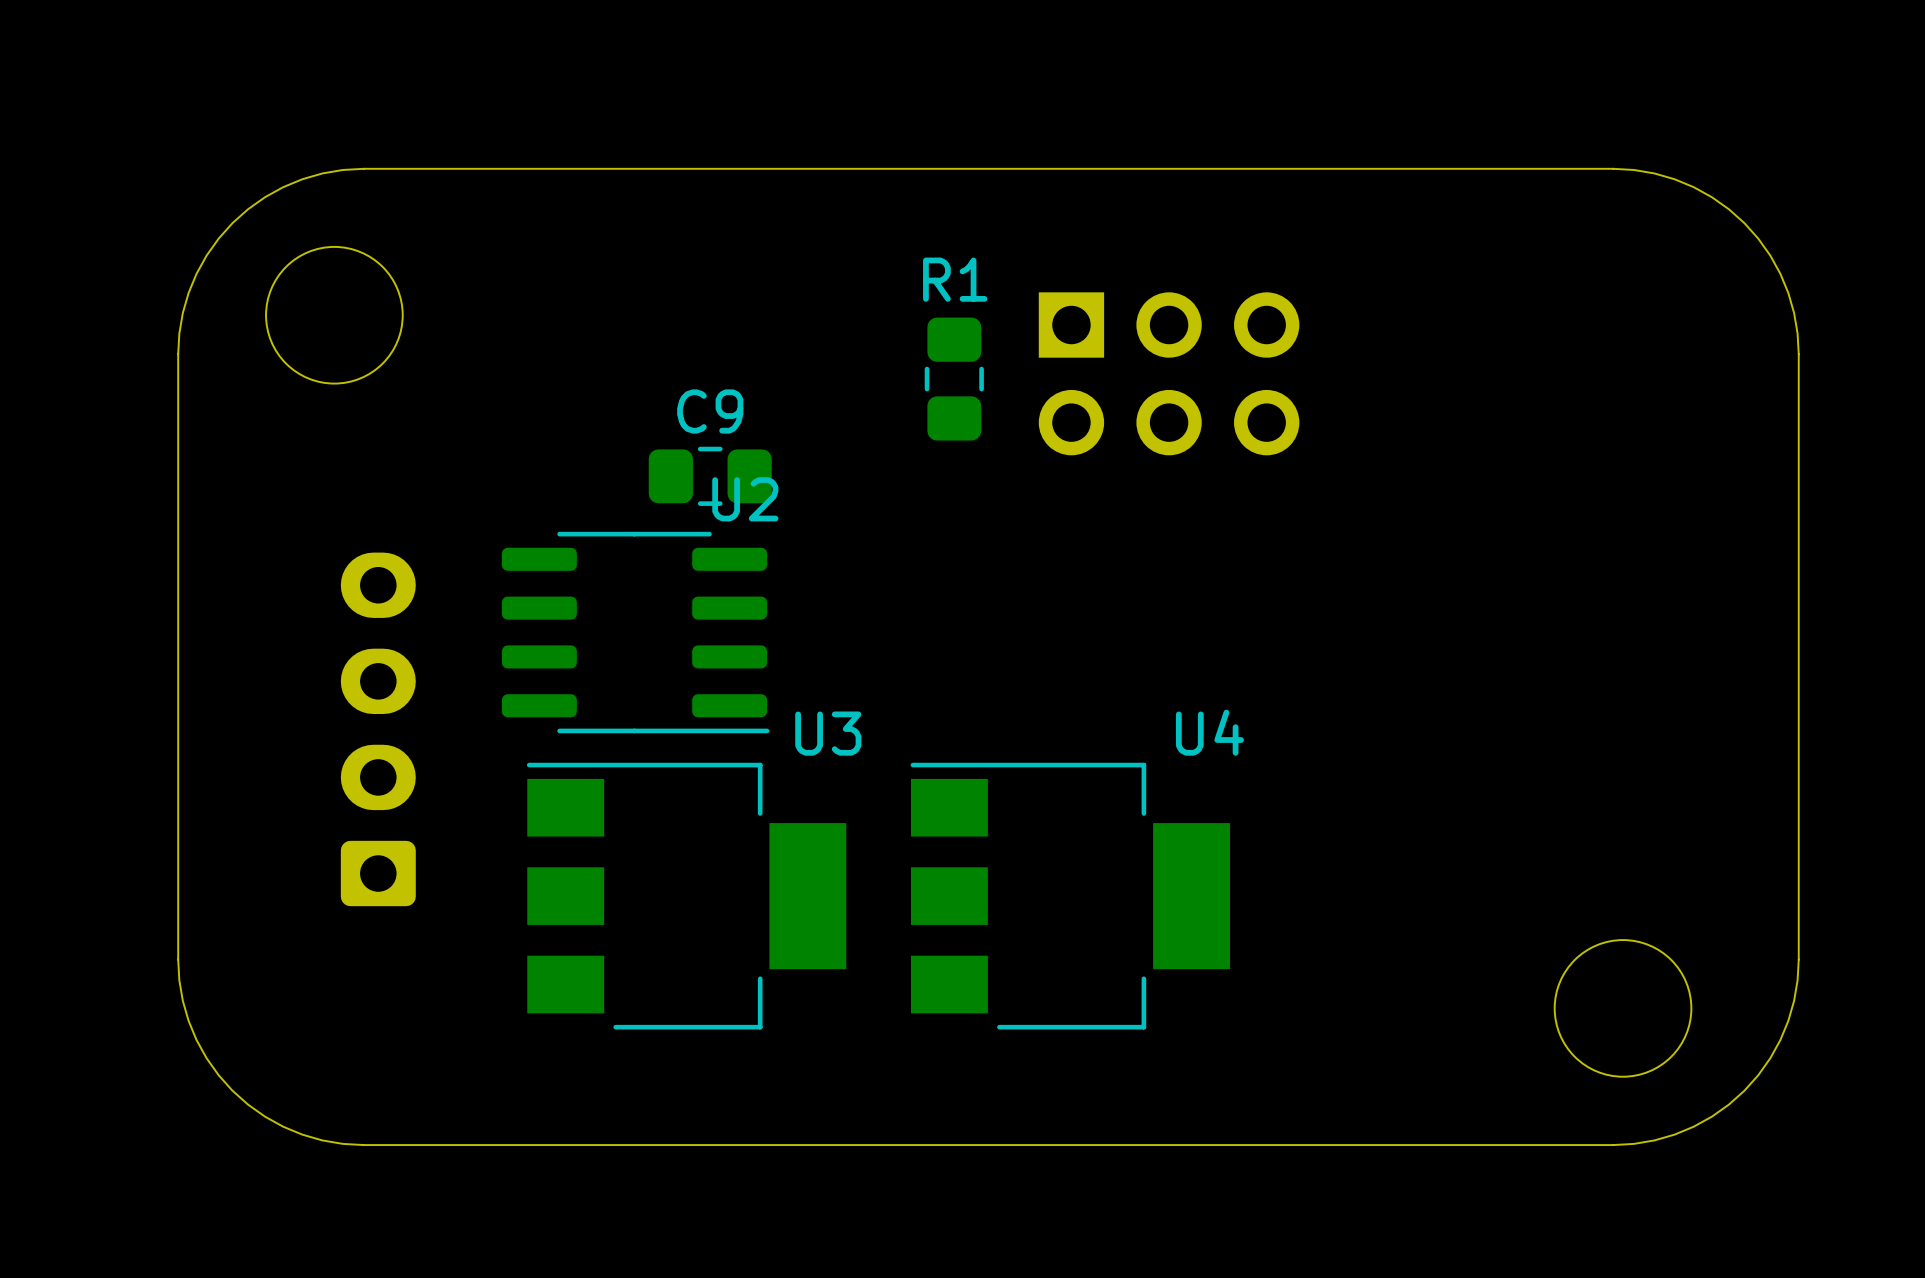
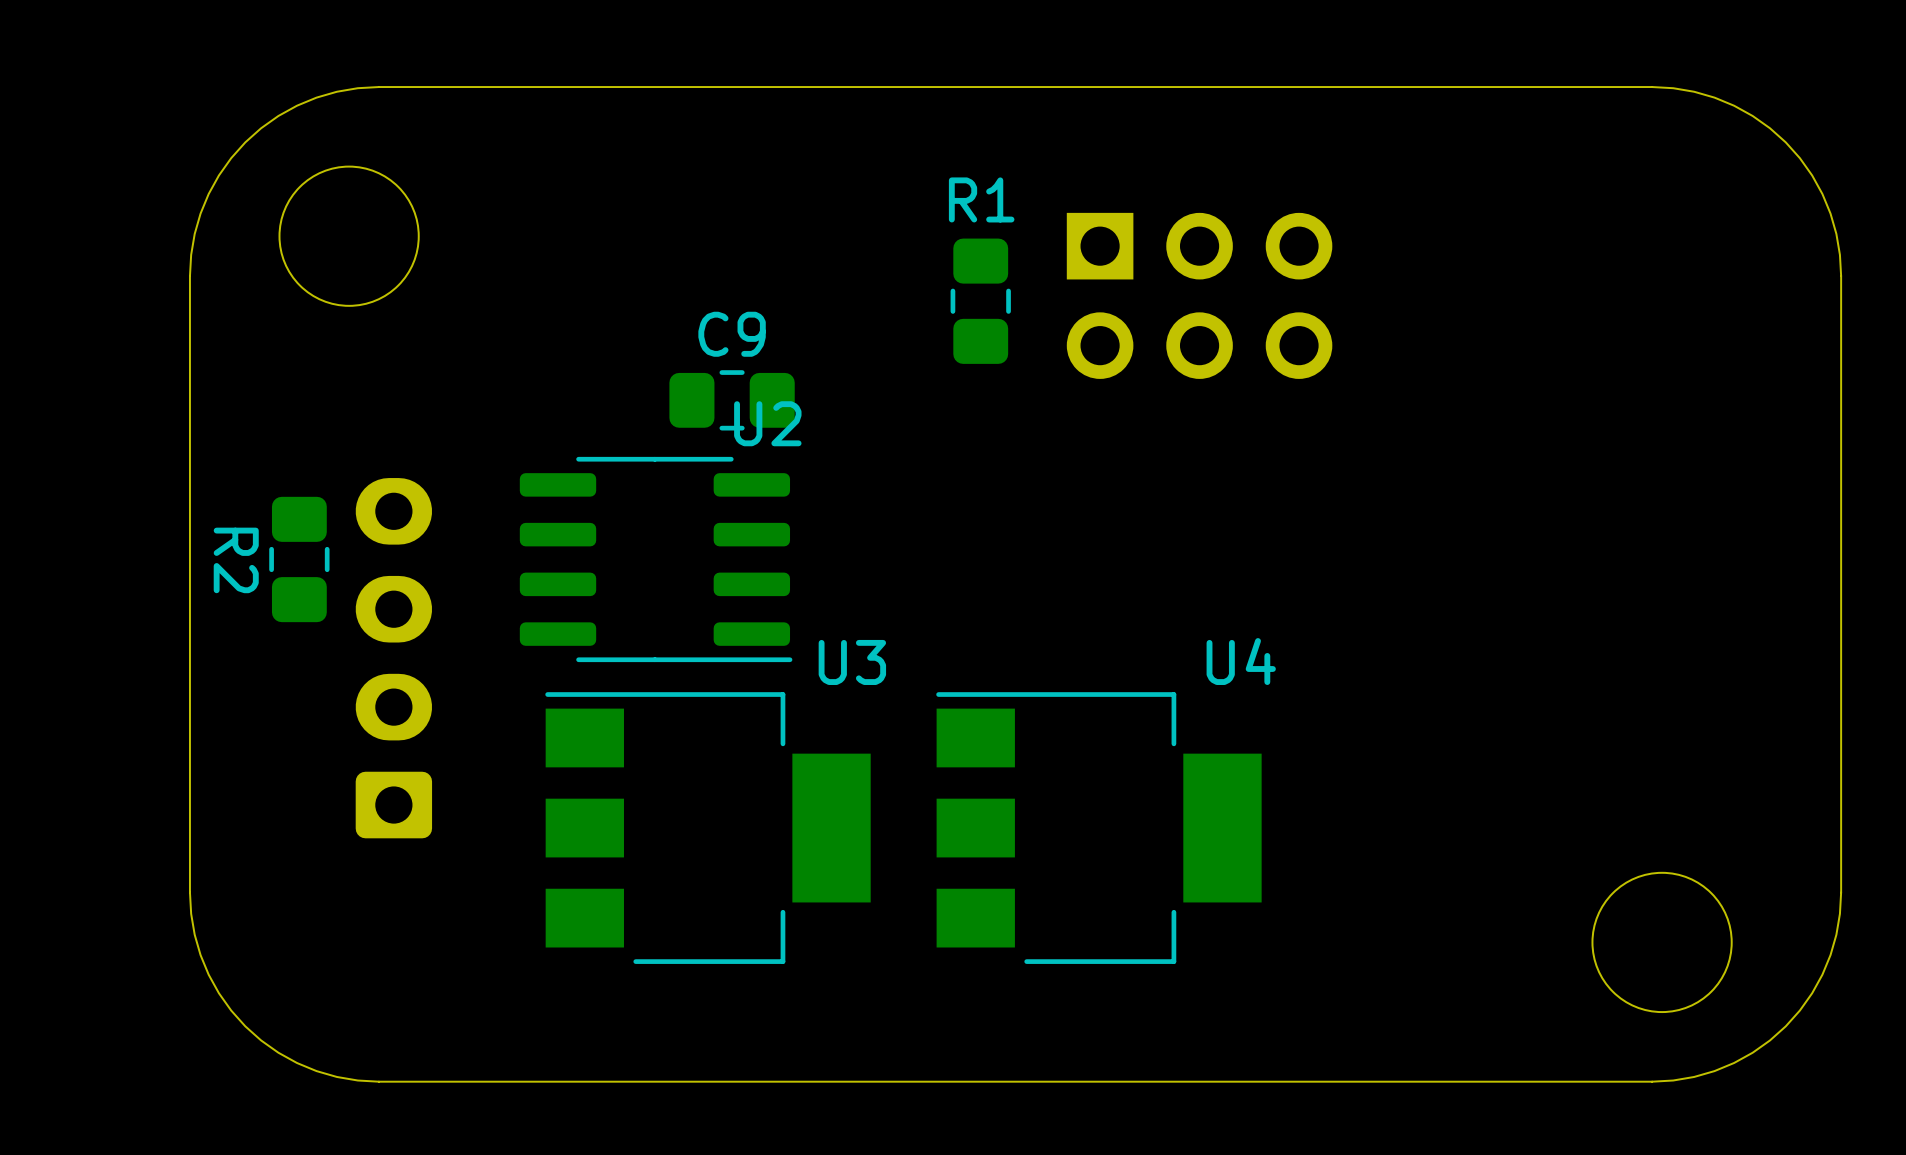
R2: none -> (299, 559)

